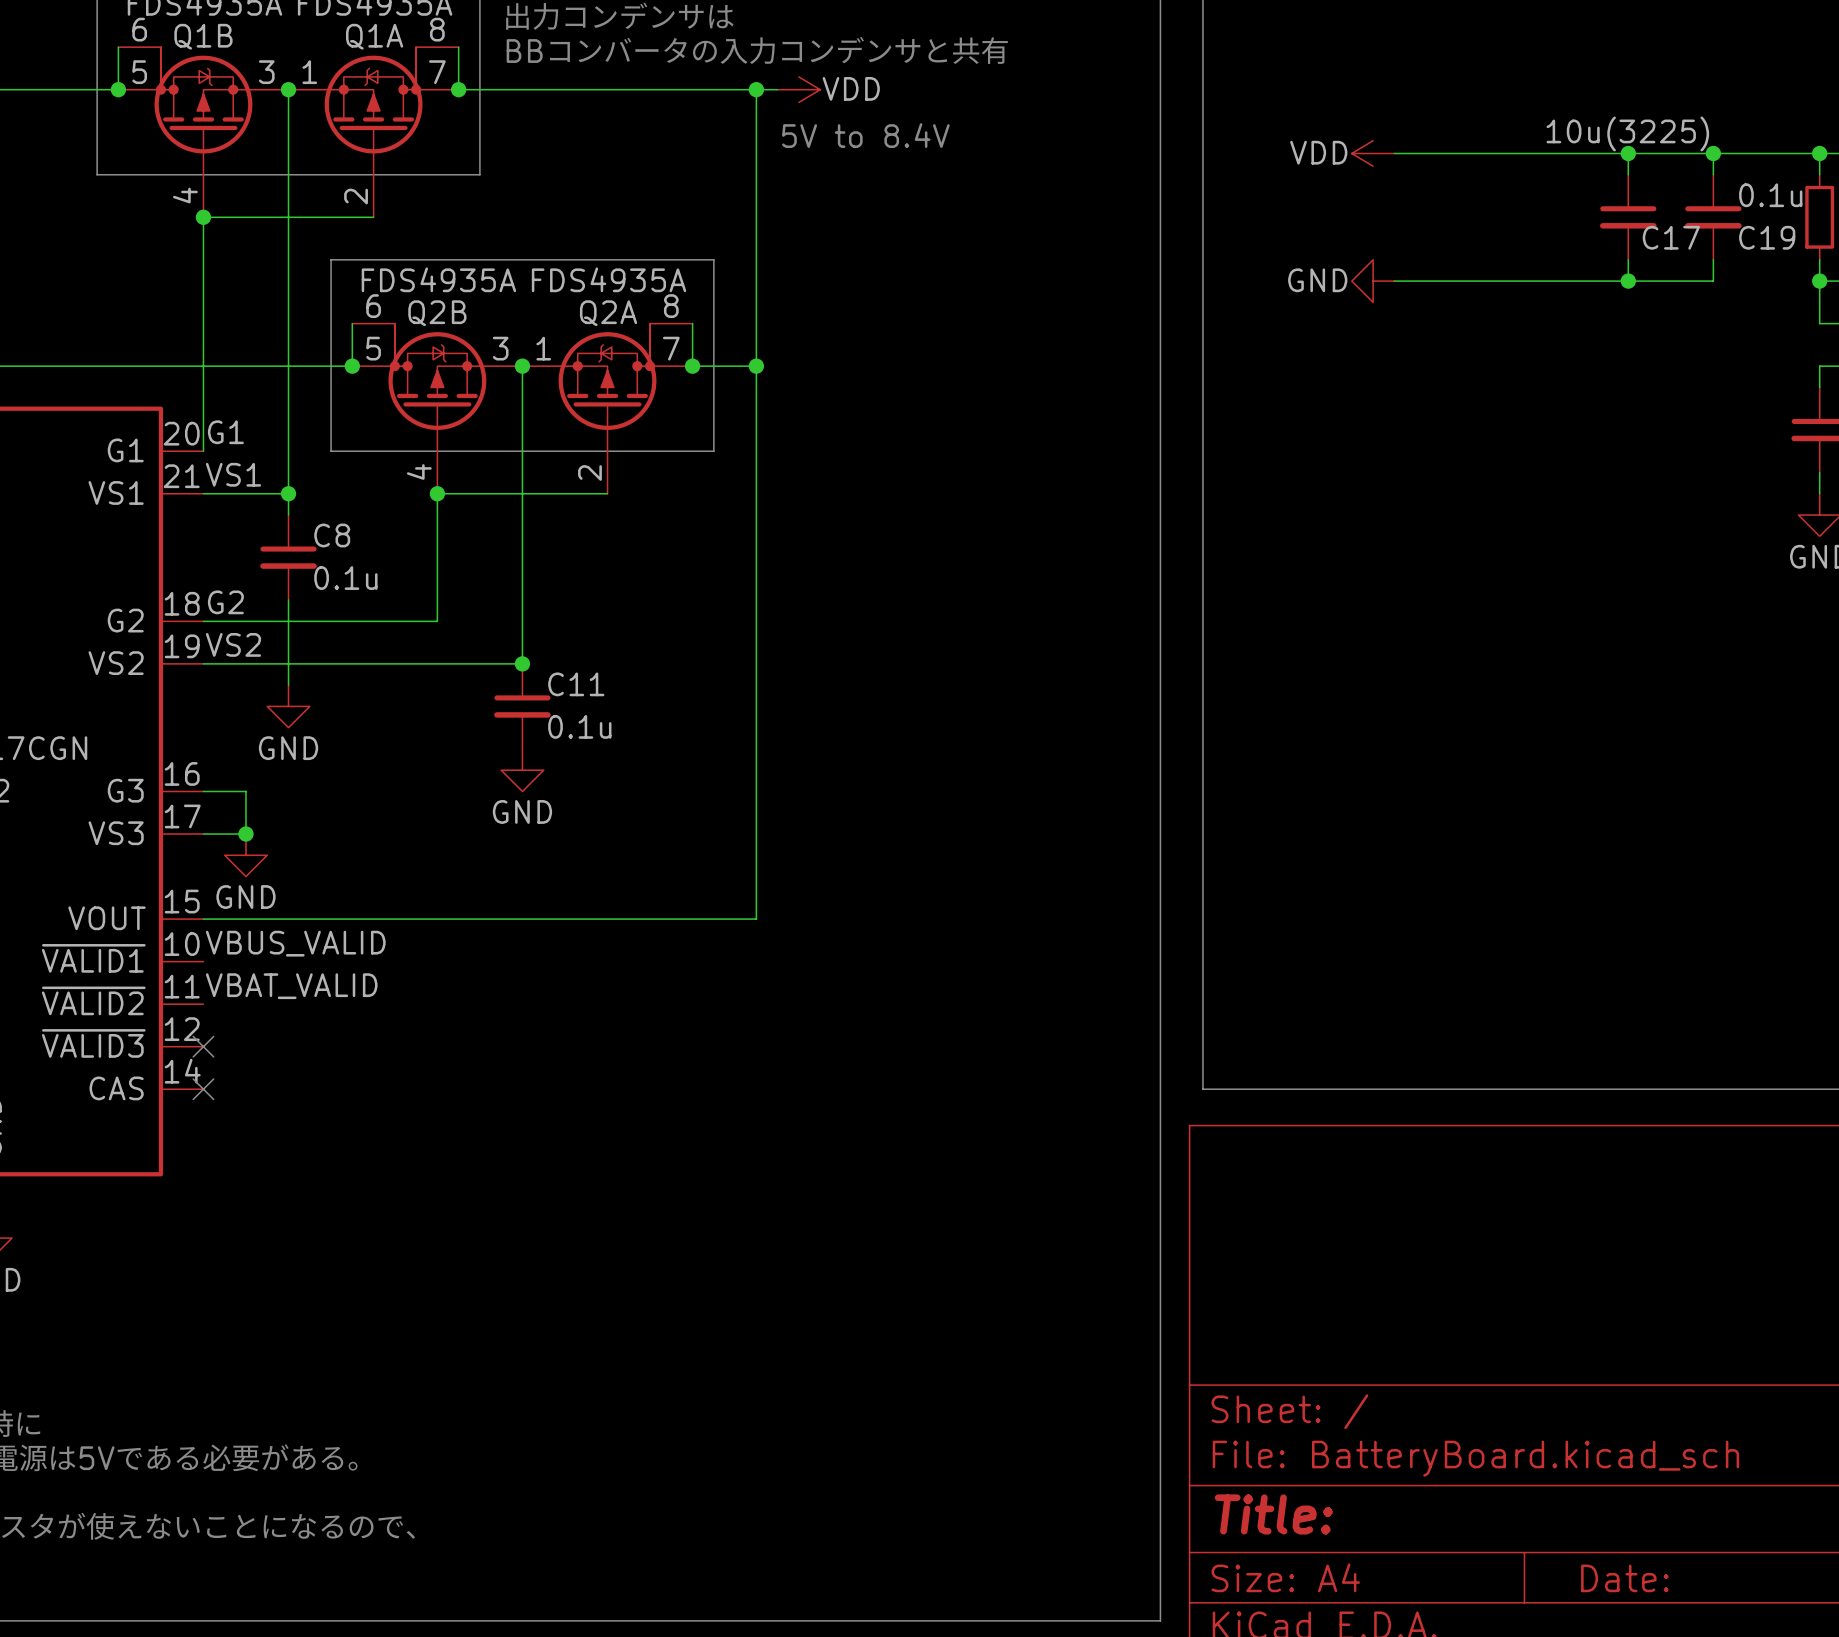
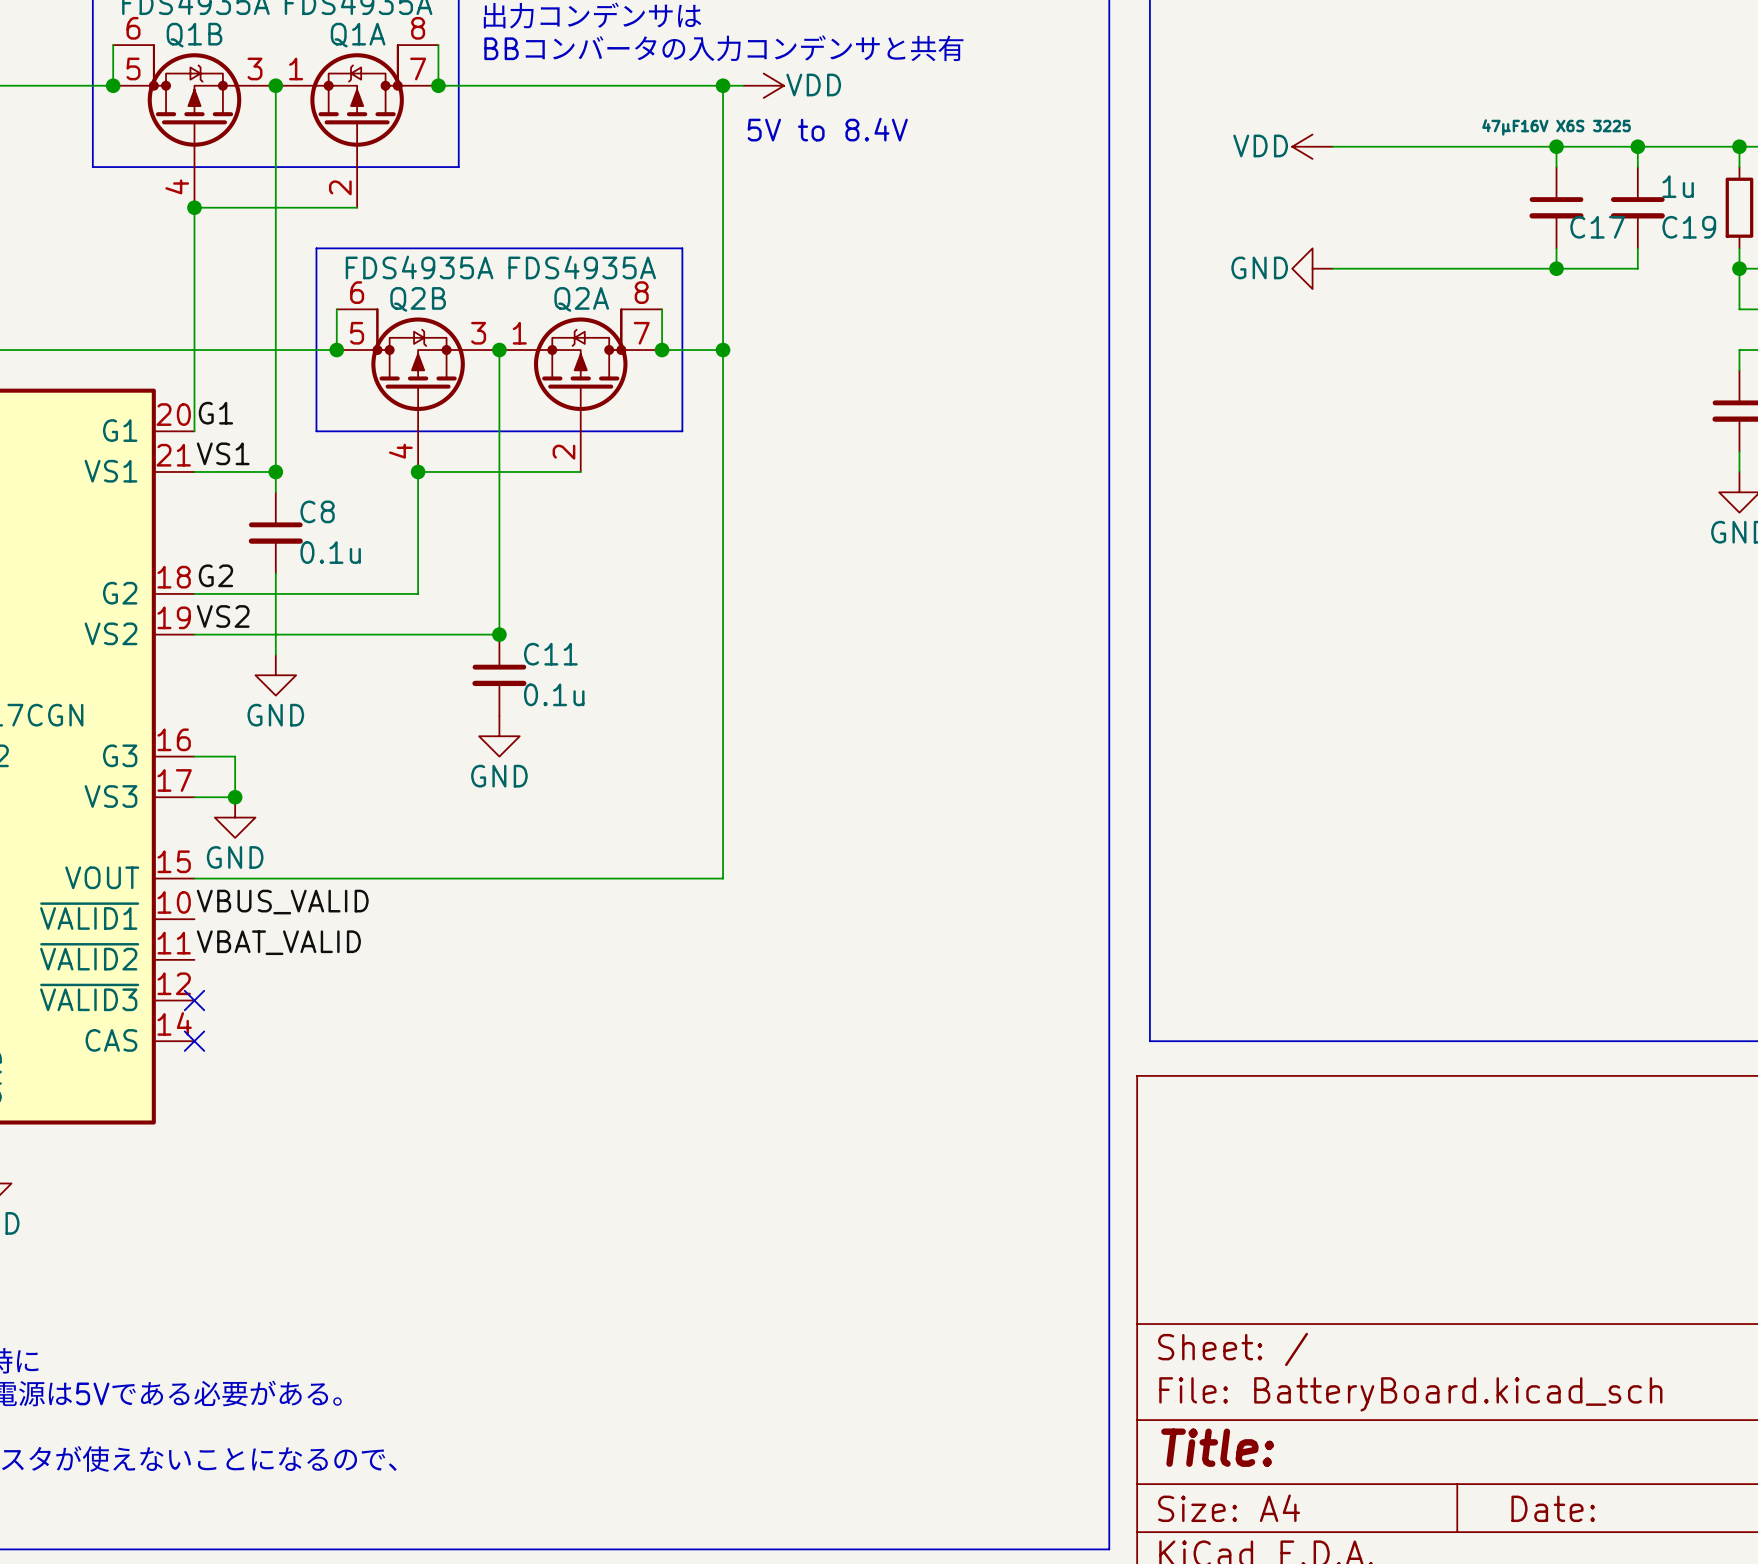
C17 value: 10u(3225) (1627, 133) -> 47μF16V X6S 3225 (1556, 127)
C19 value: 0.1u (1770, 195) -> 1u (1678, 186)

